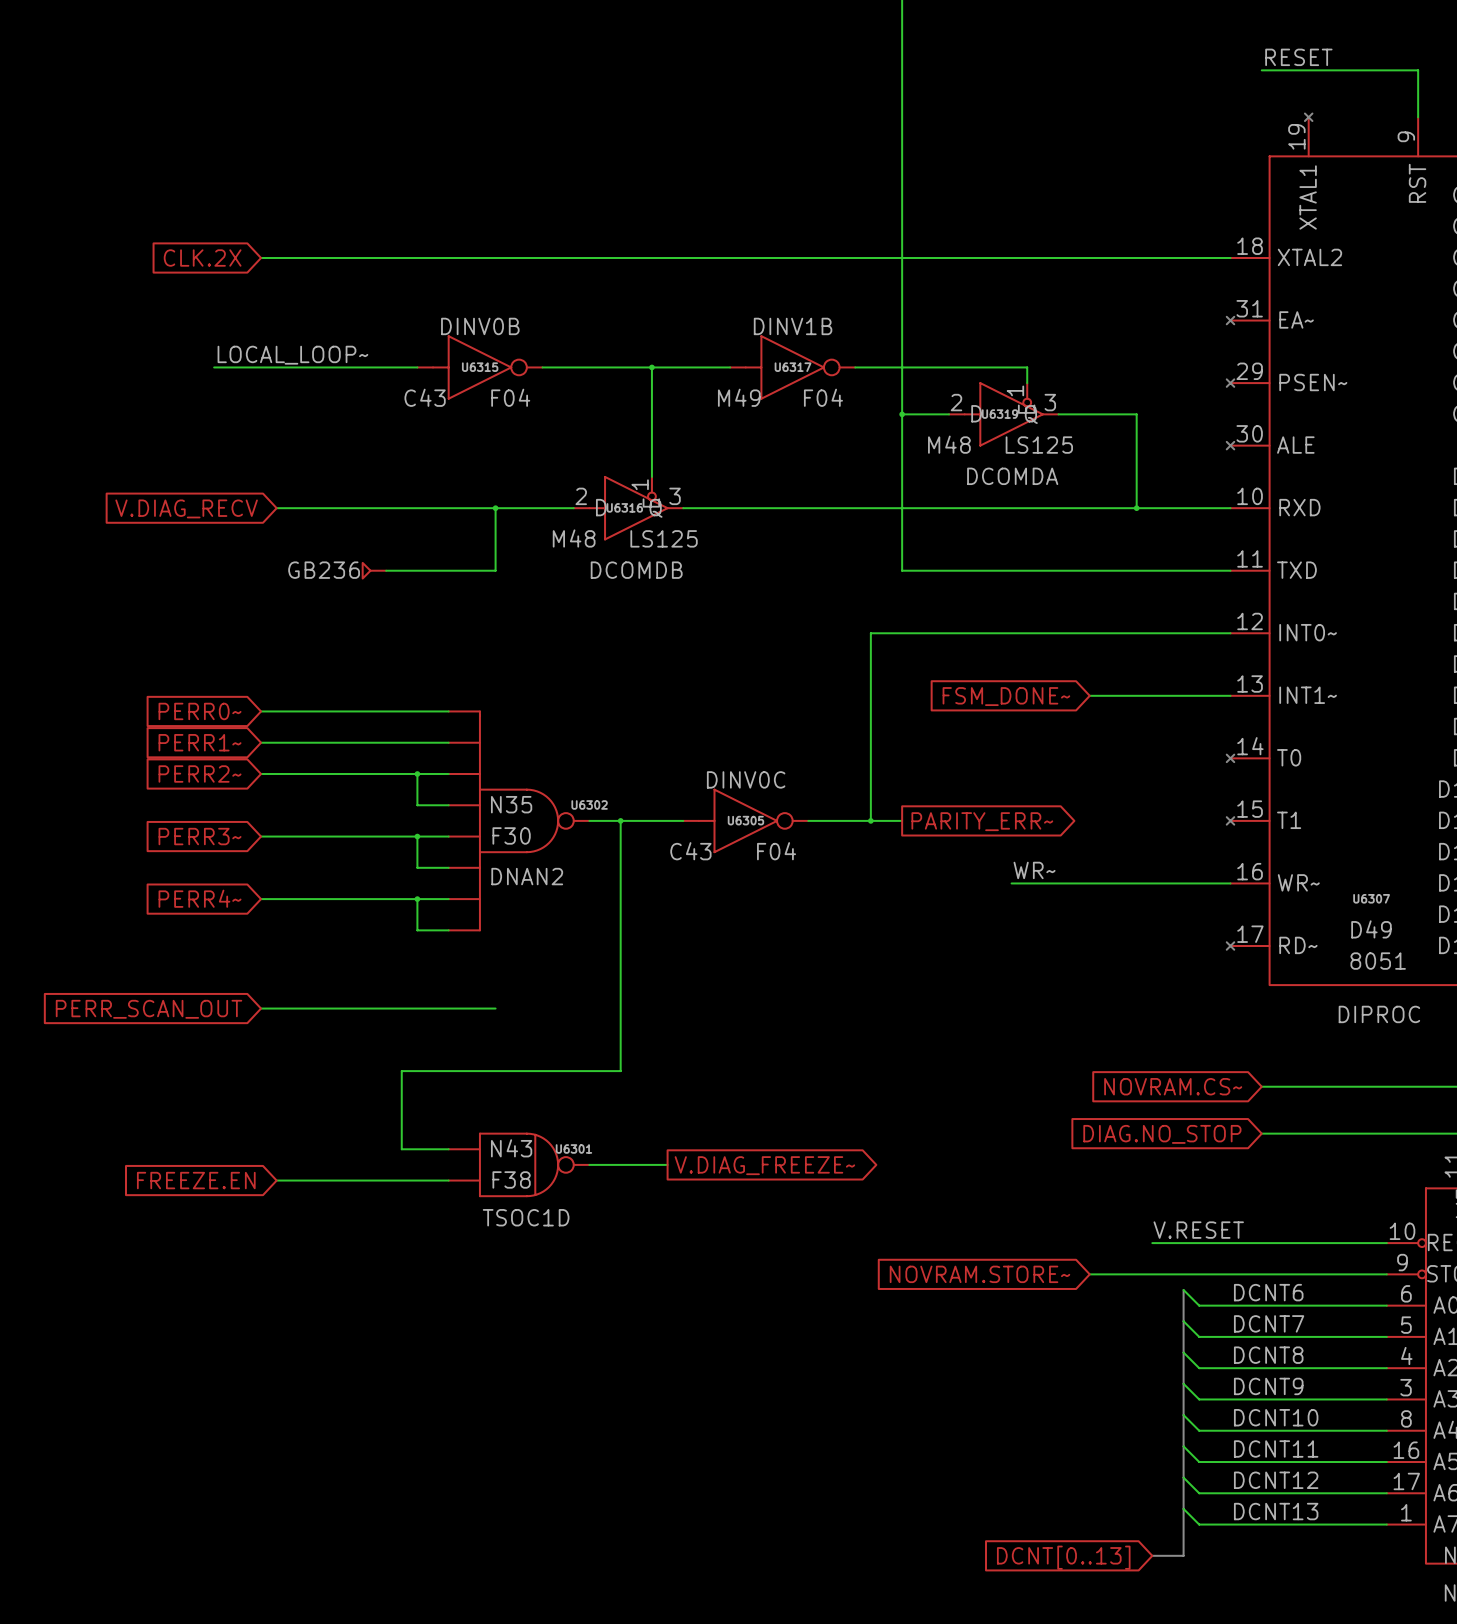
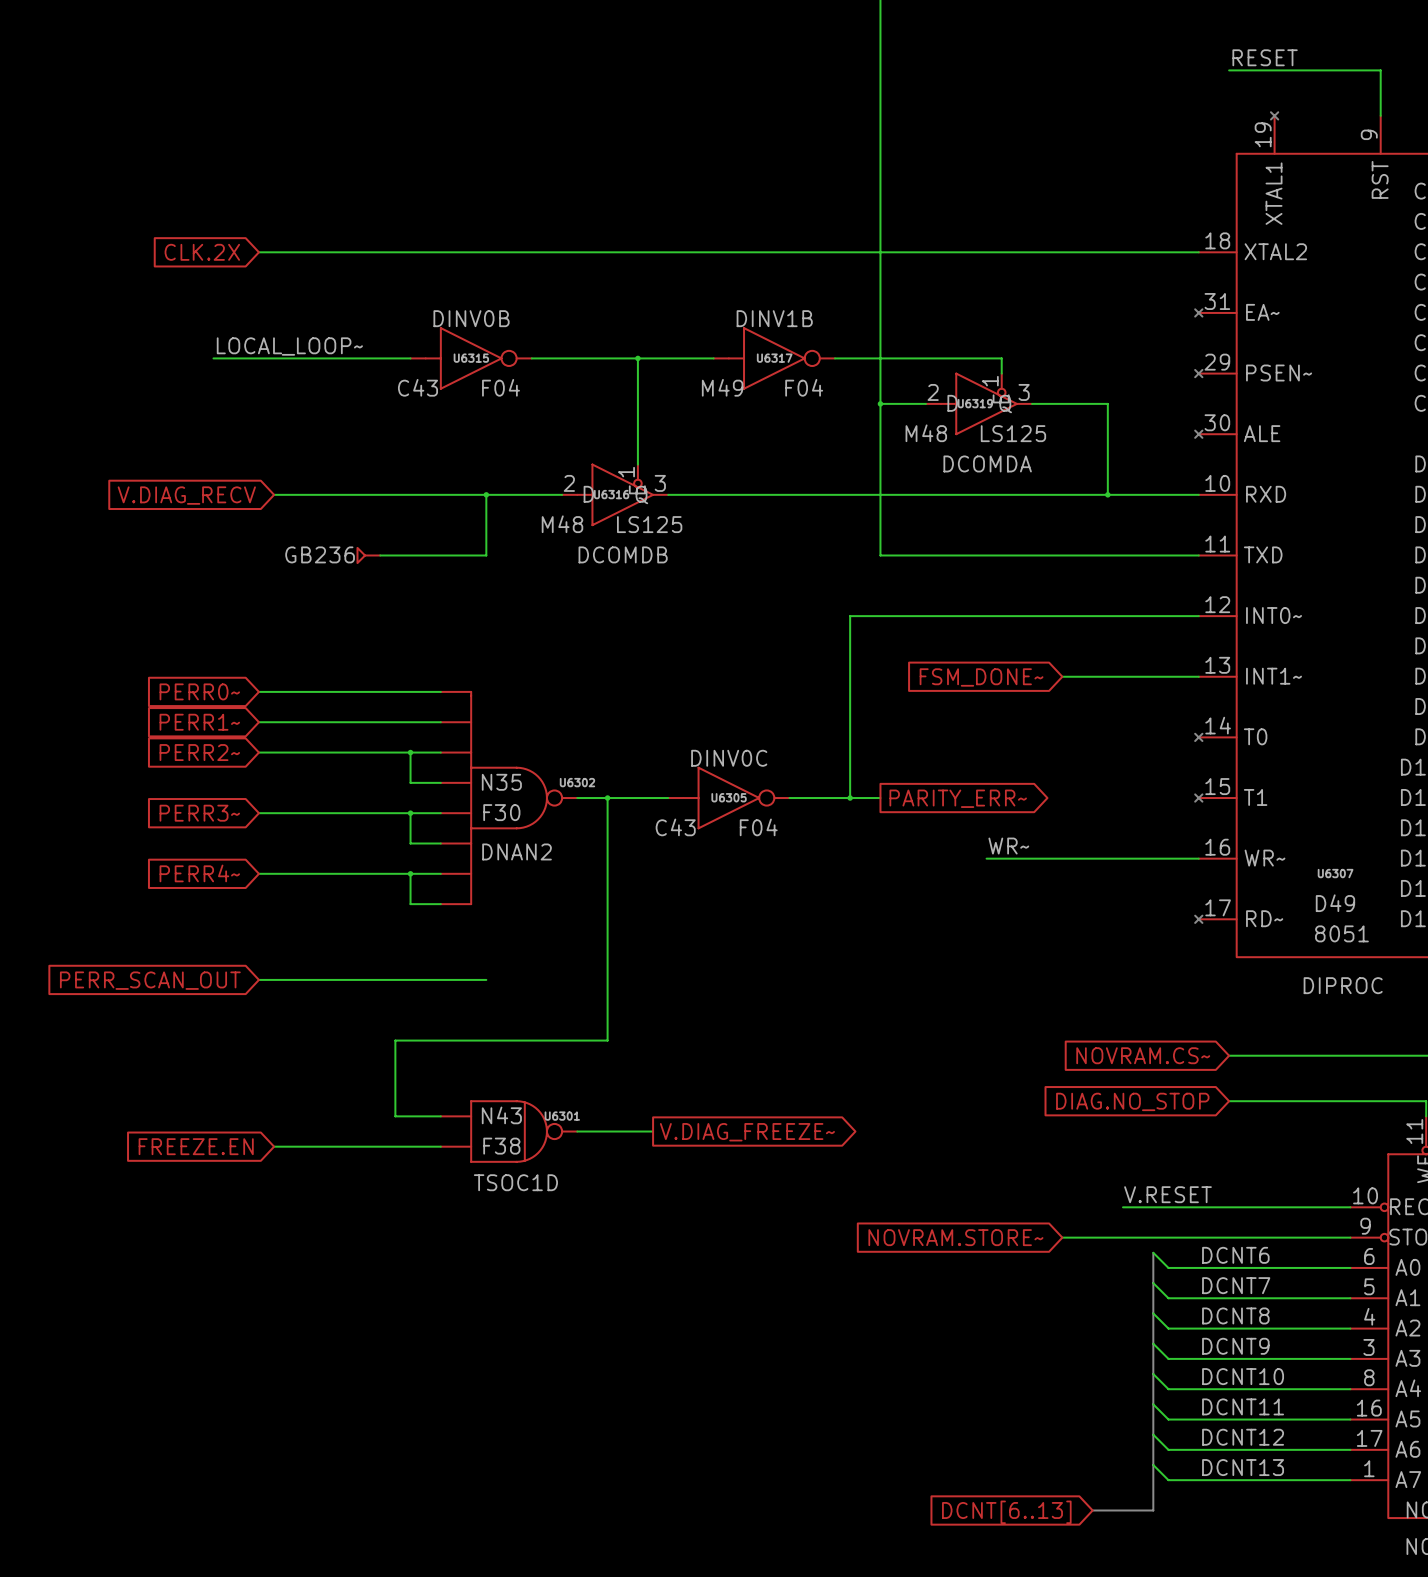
bus: none -> (1092, 1510) (1123, 1510)
global label: DCNT[0..13] (1063, 1557) -> DCNT[6..13] (1006, 1512)

